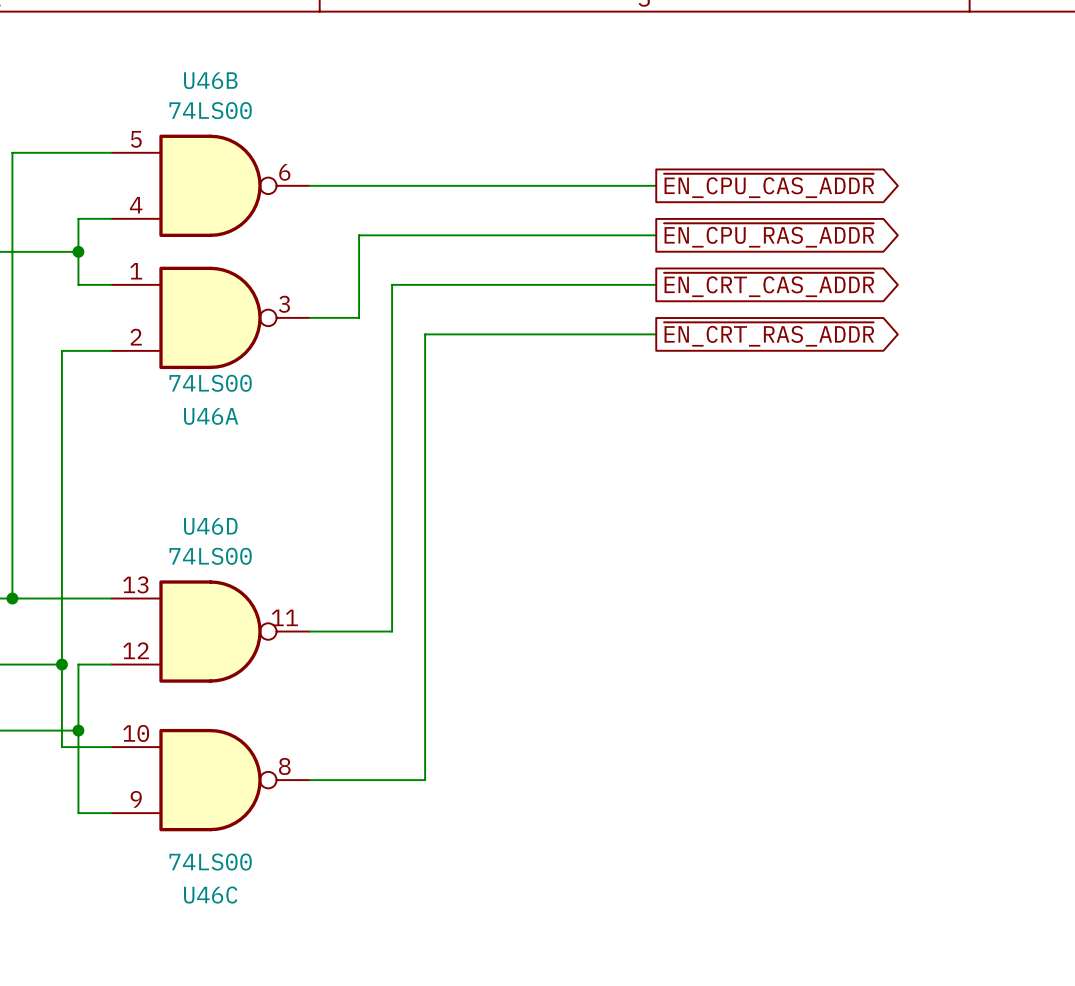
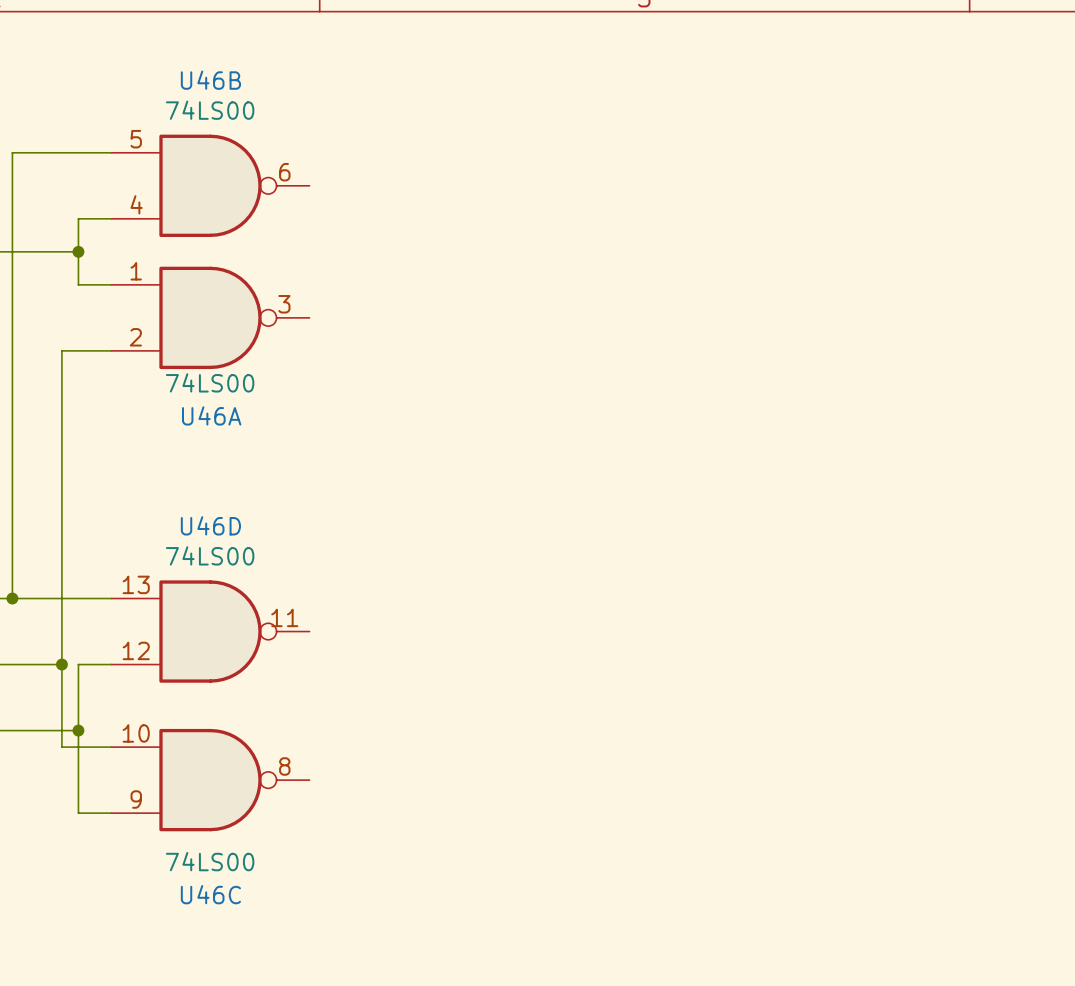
wire: (309, 185) (656, 185) -> none
global label: ~{EN_CPU_CAS_ADDR} (769, 185) -> none
wire: (656, 235) (359, 235) (359, 317) (309, 317) -> none
global label: ~{EN_CPU_RAS_ADDR} (769, 235) -> none
wire: (656, 284) (392, 284) (392, 631) (309, 631) -> none
global label: ~{EN_CRT_CAS_ADDR} (769, 284) -> none
wire: (656, 334) (425, 334) (425, 780) (309, 780) -> none
global label: ~{EN_CRT_RAS_ADDR} (769, 334) -> none

